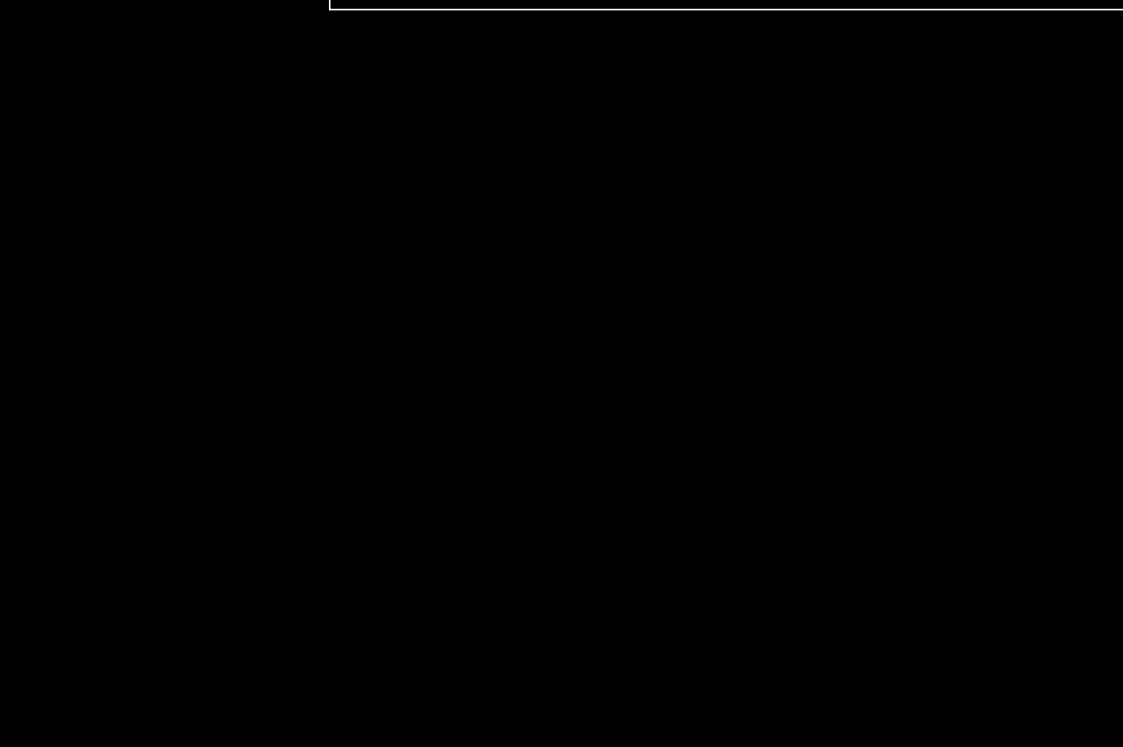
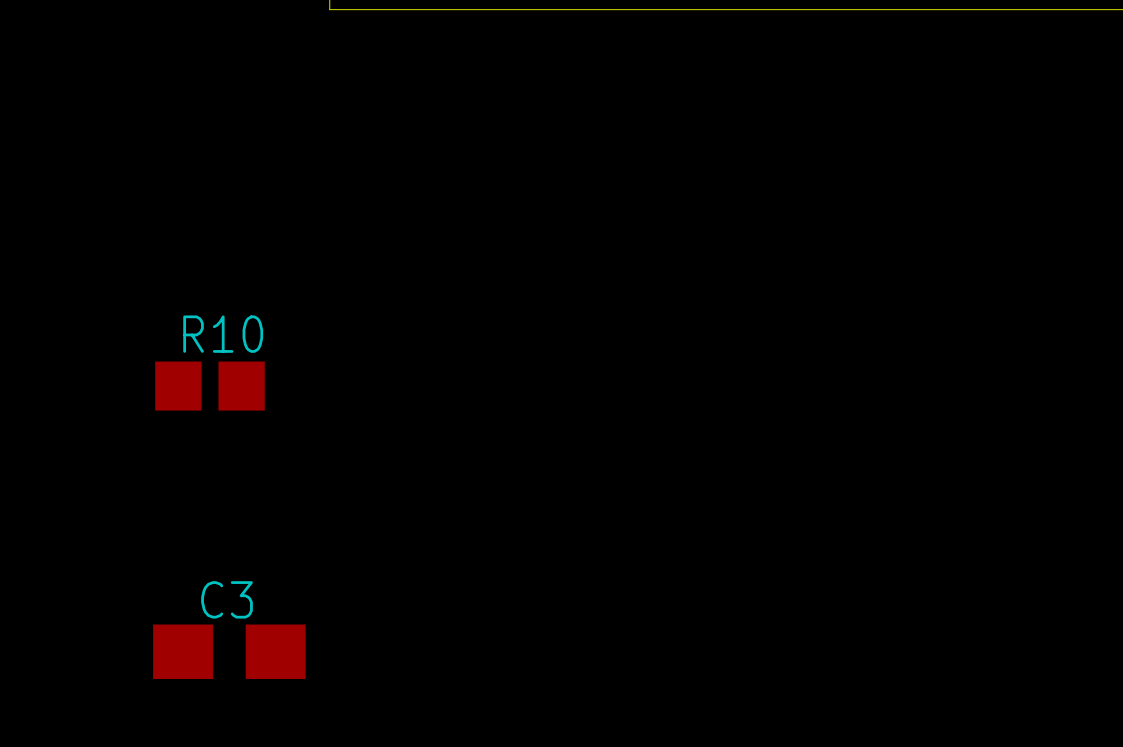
R10: none -> (210, 386)
C3: none -> (229, 651)

